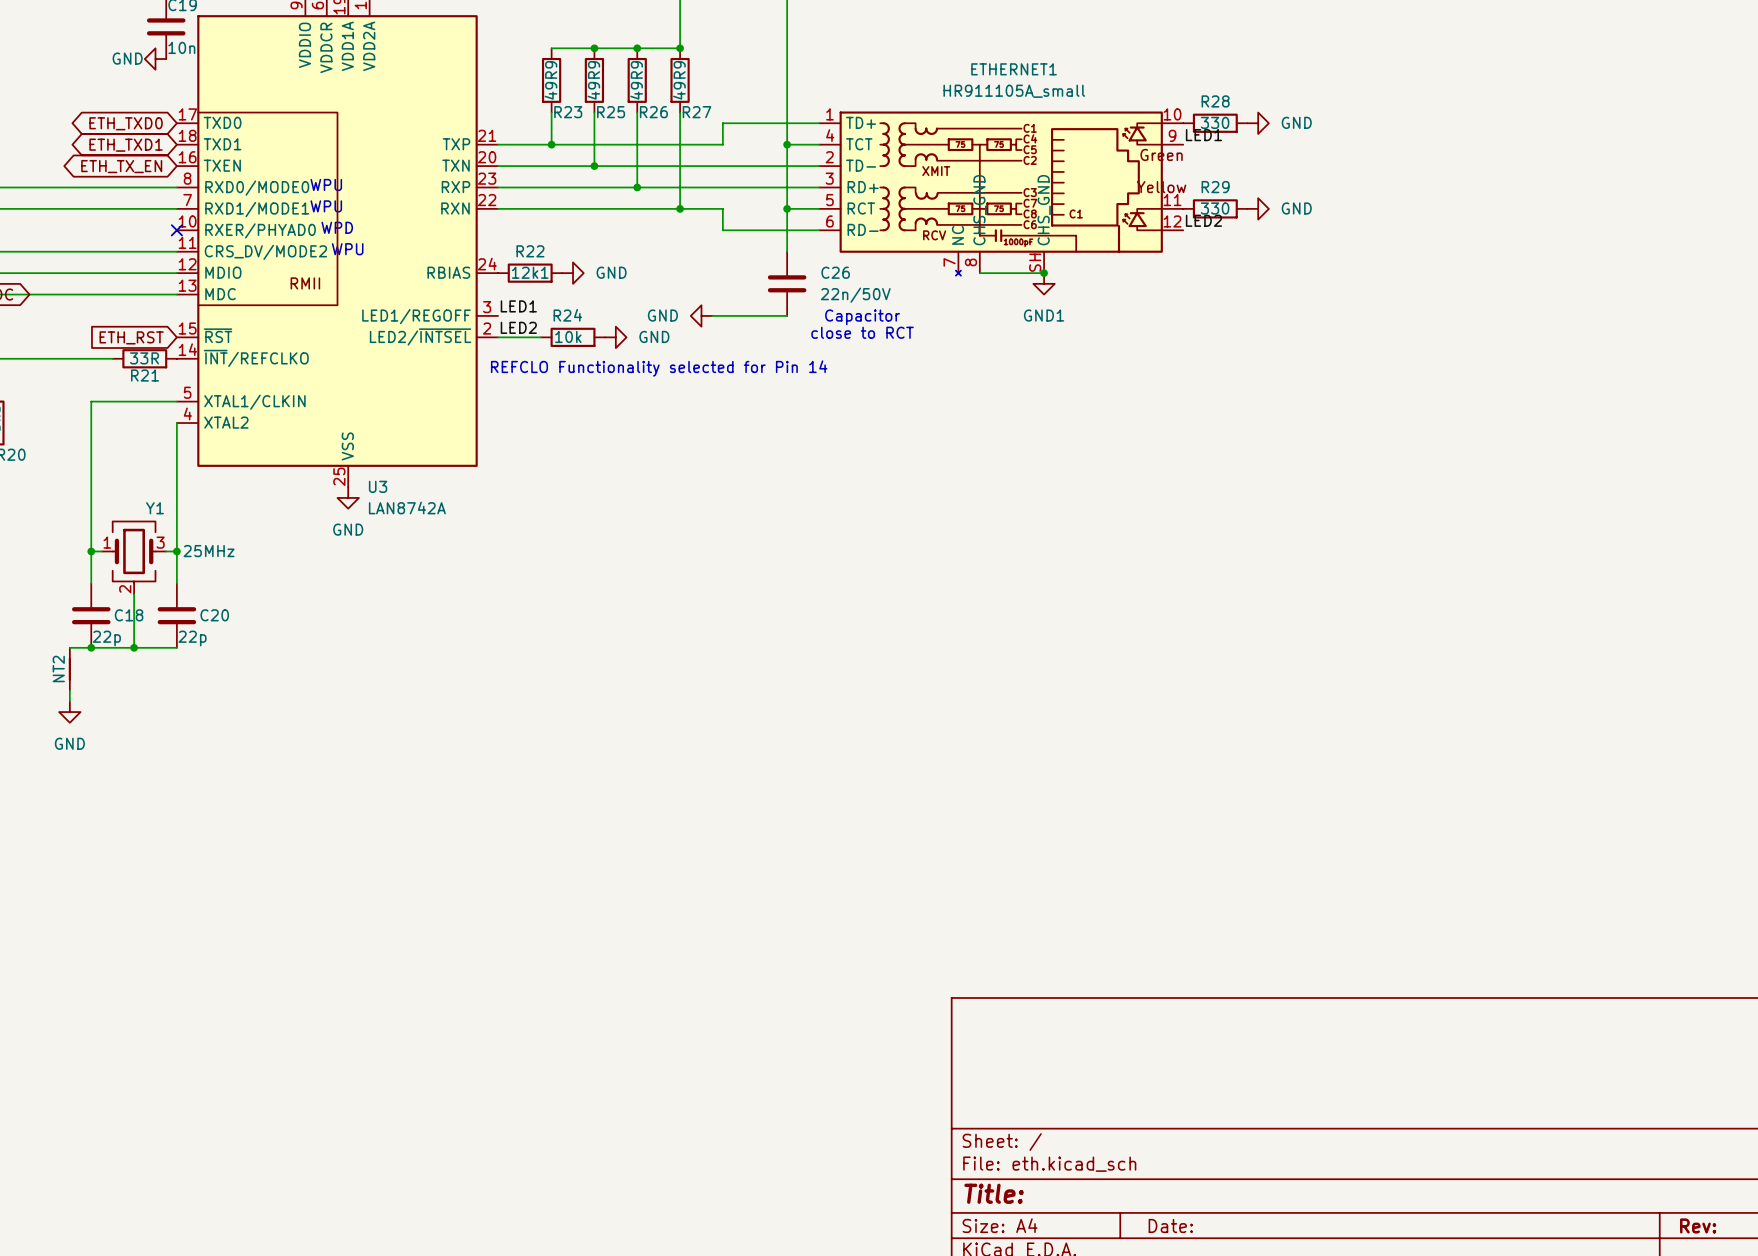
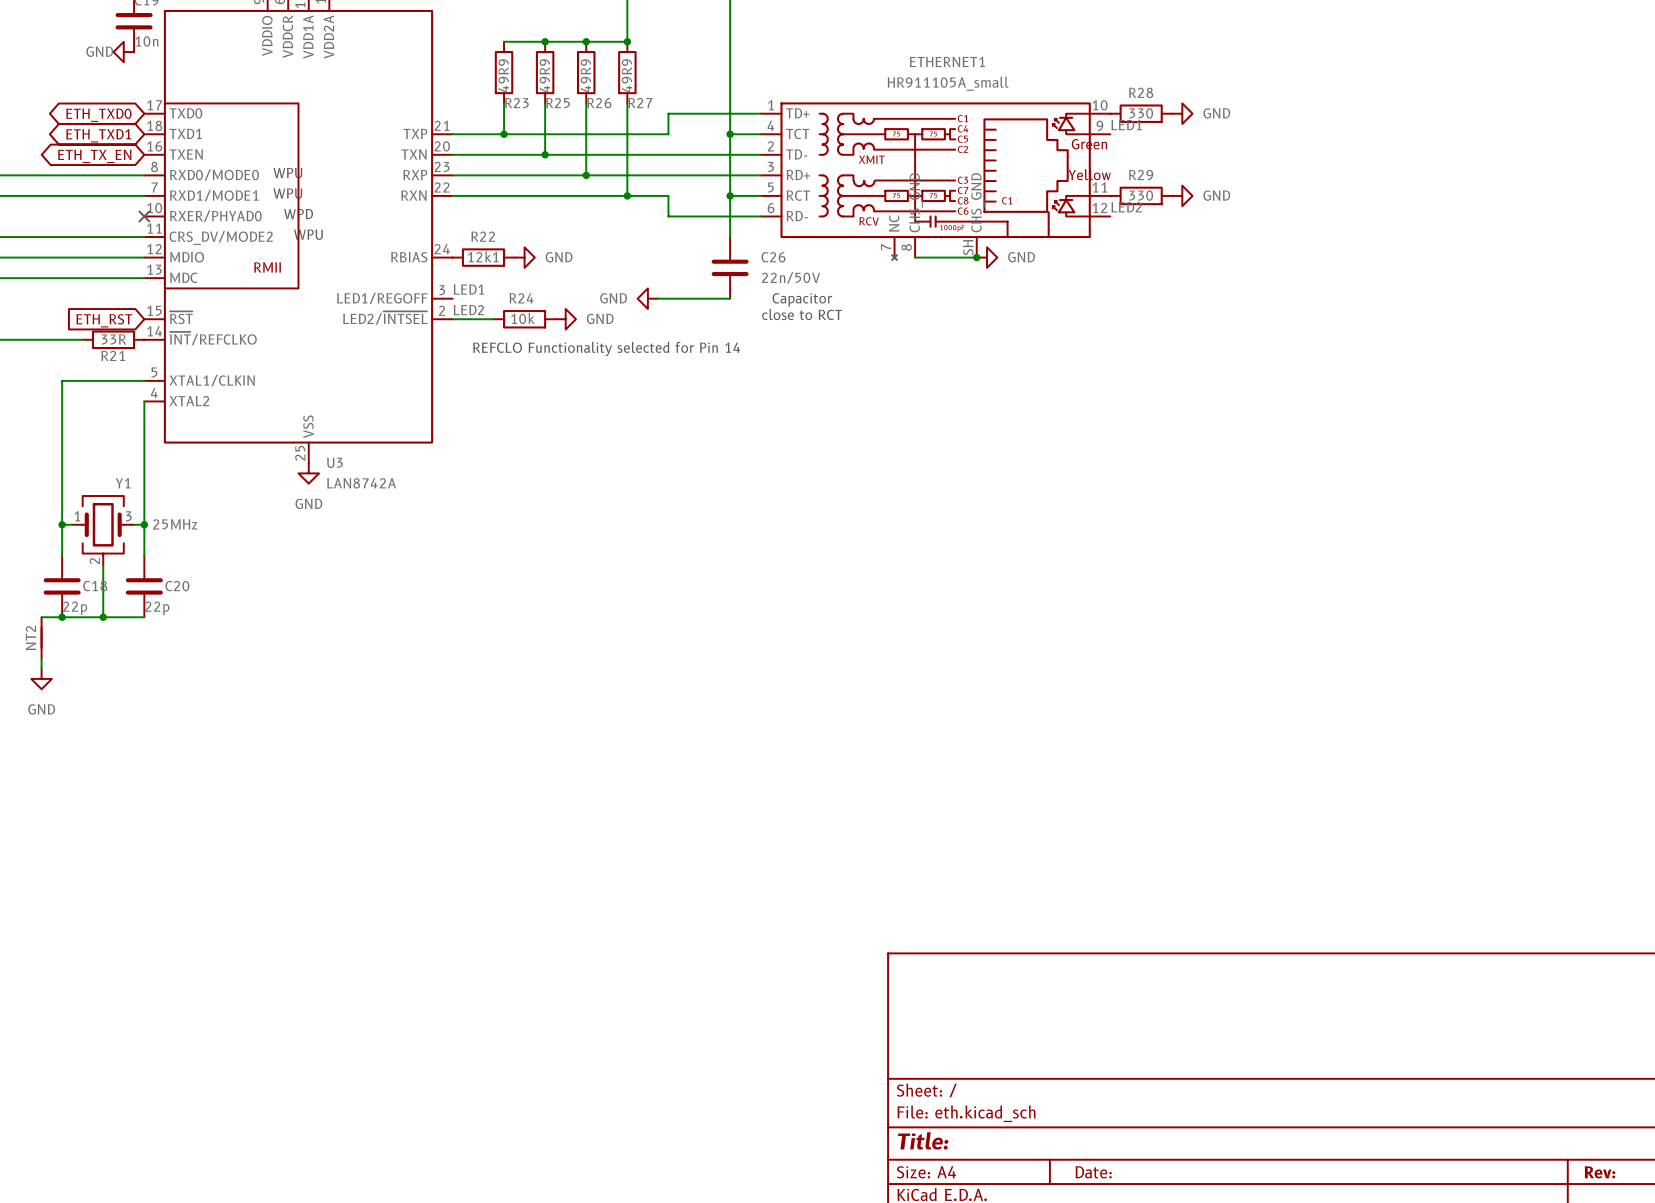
power symbol: none -> GND (987, 257)
power symbol: GND1 (1044, 283) -> none

